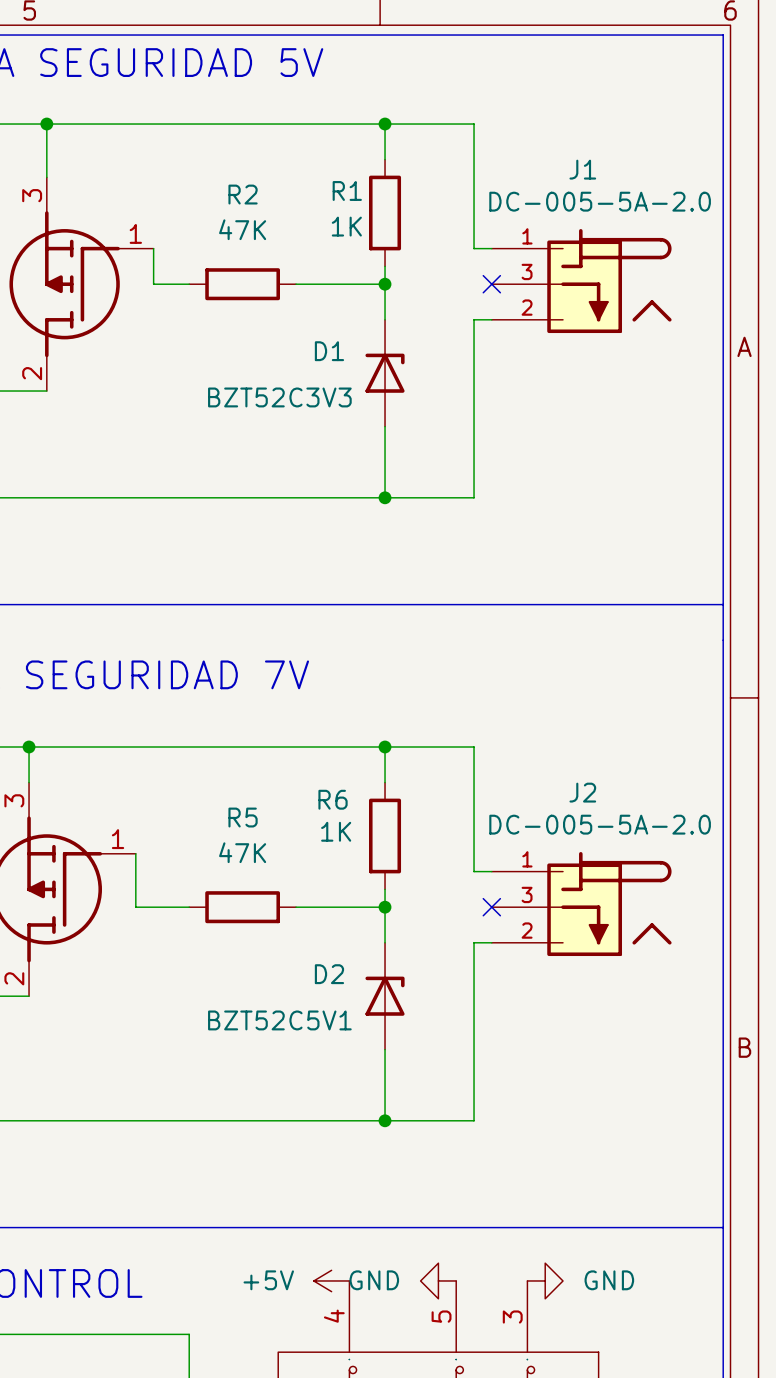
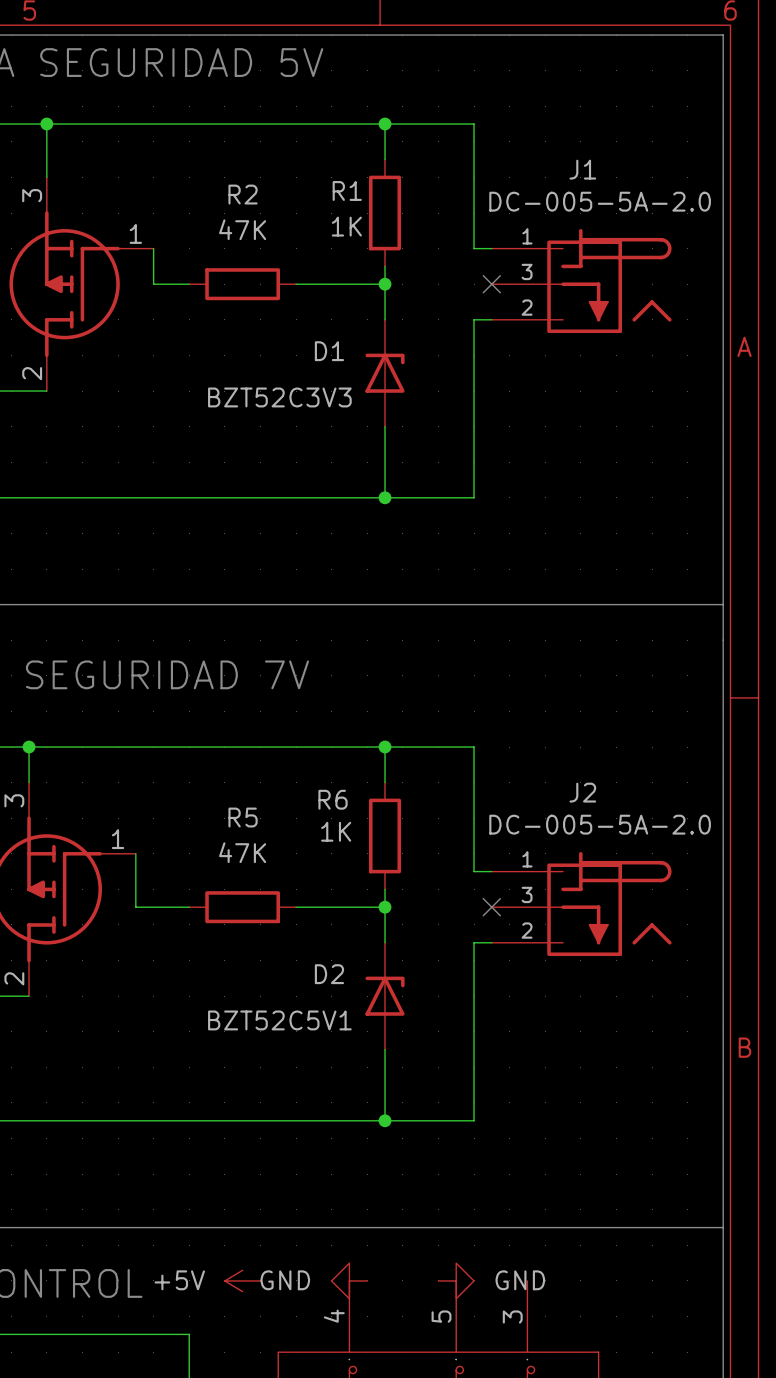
power symbol position: +5V (331, 1280) -> +5V (242, 1280)
power symbol: none -> GND (349, 1280)
power symbol rotation: 0° (438, 1280) -> 180° (456, 1280)
power symbol: GND (545, 1280) -> none

